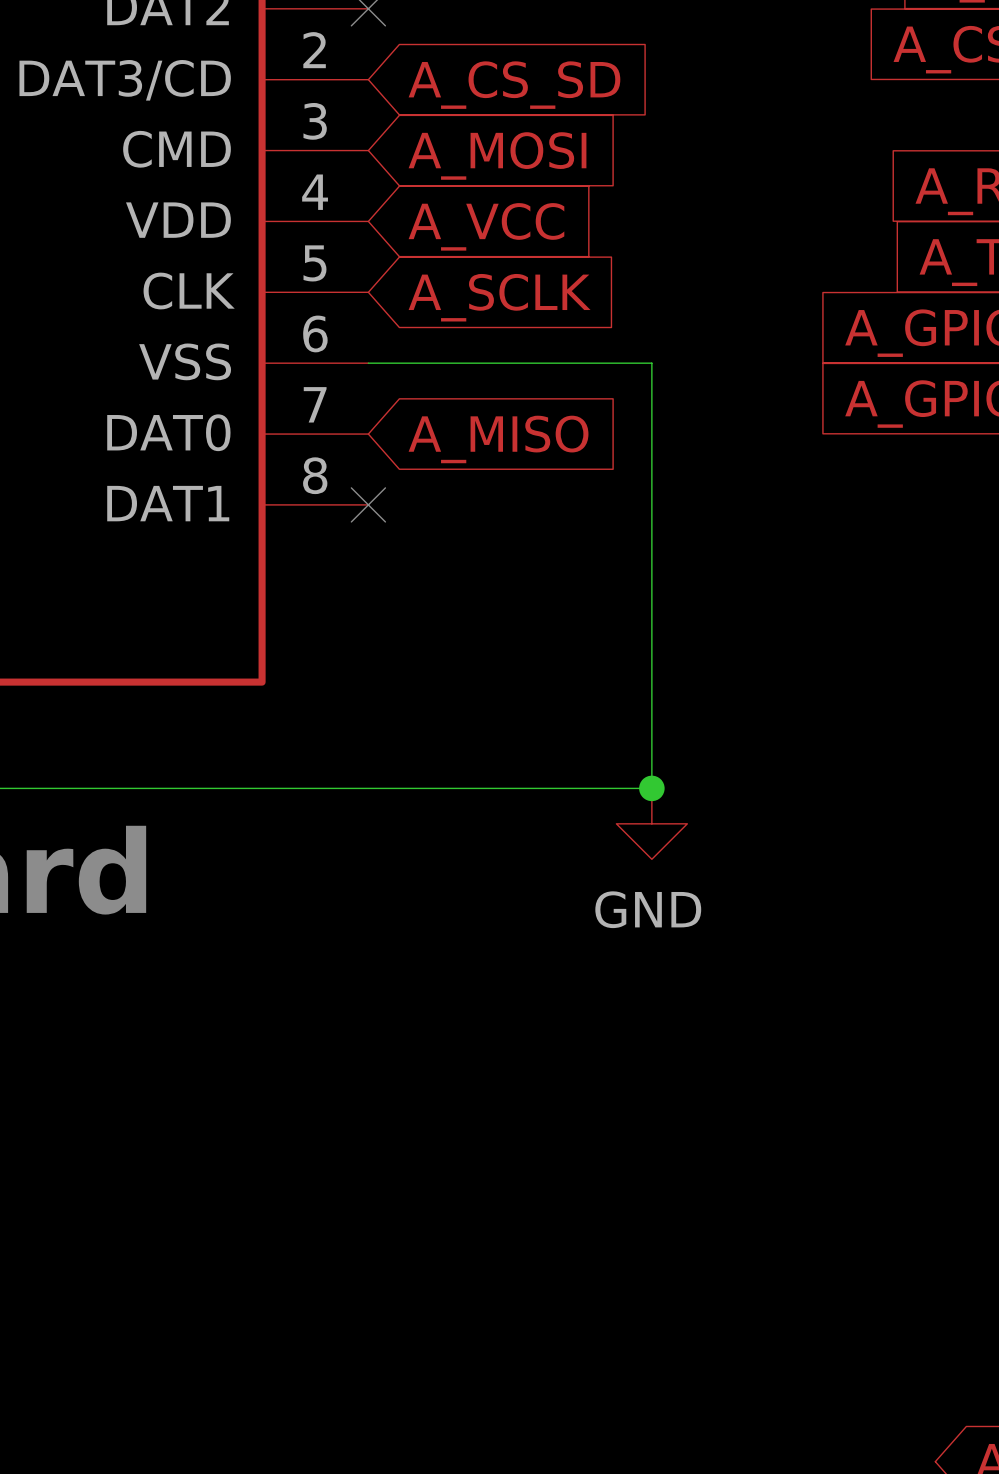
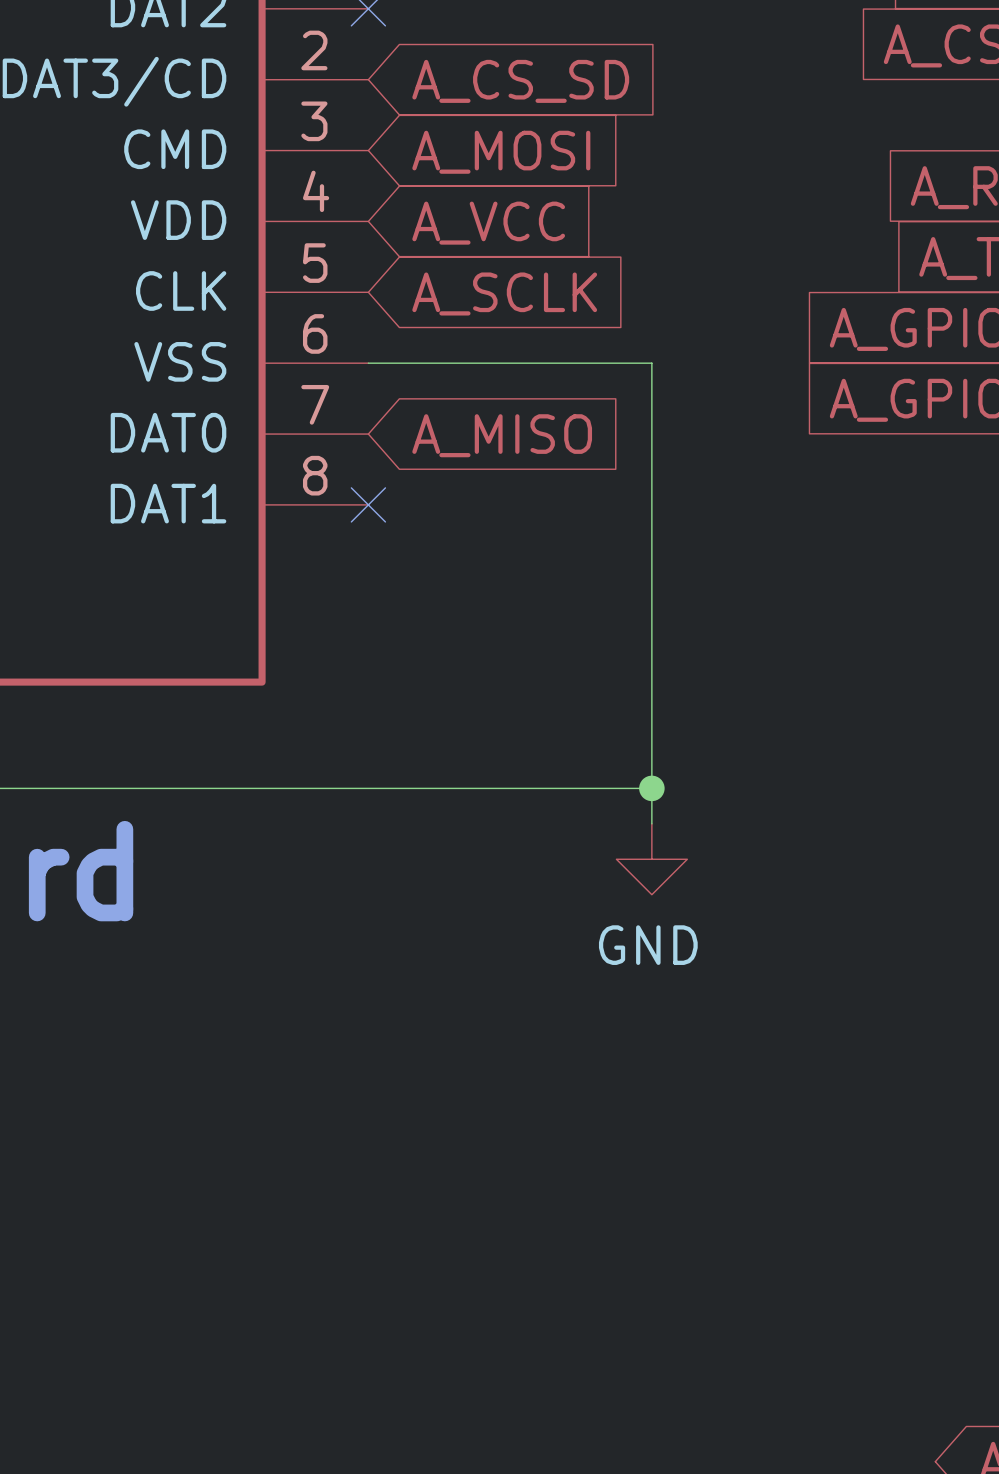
power symbol position: GND (651, 823) -> GND (651, 859)

